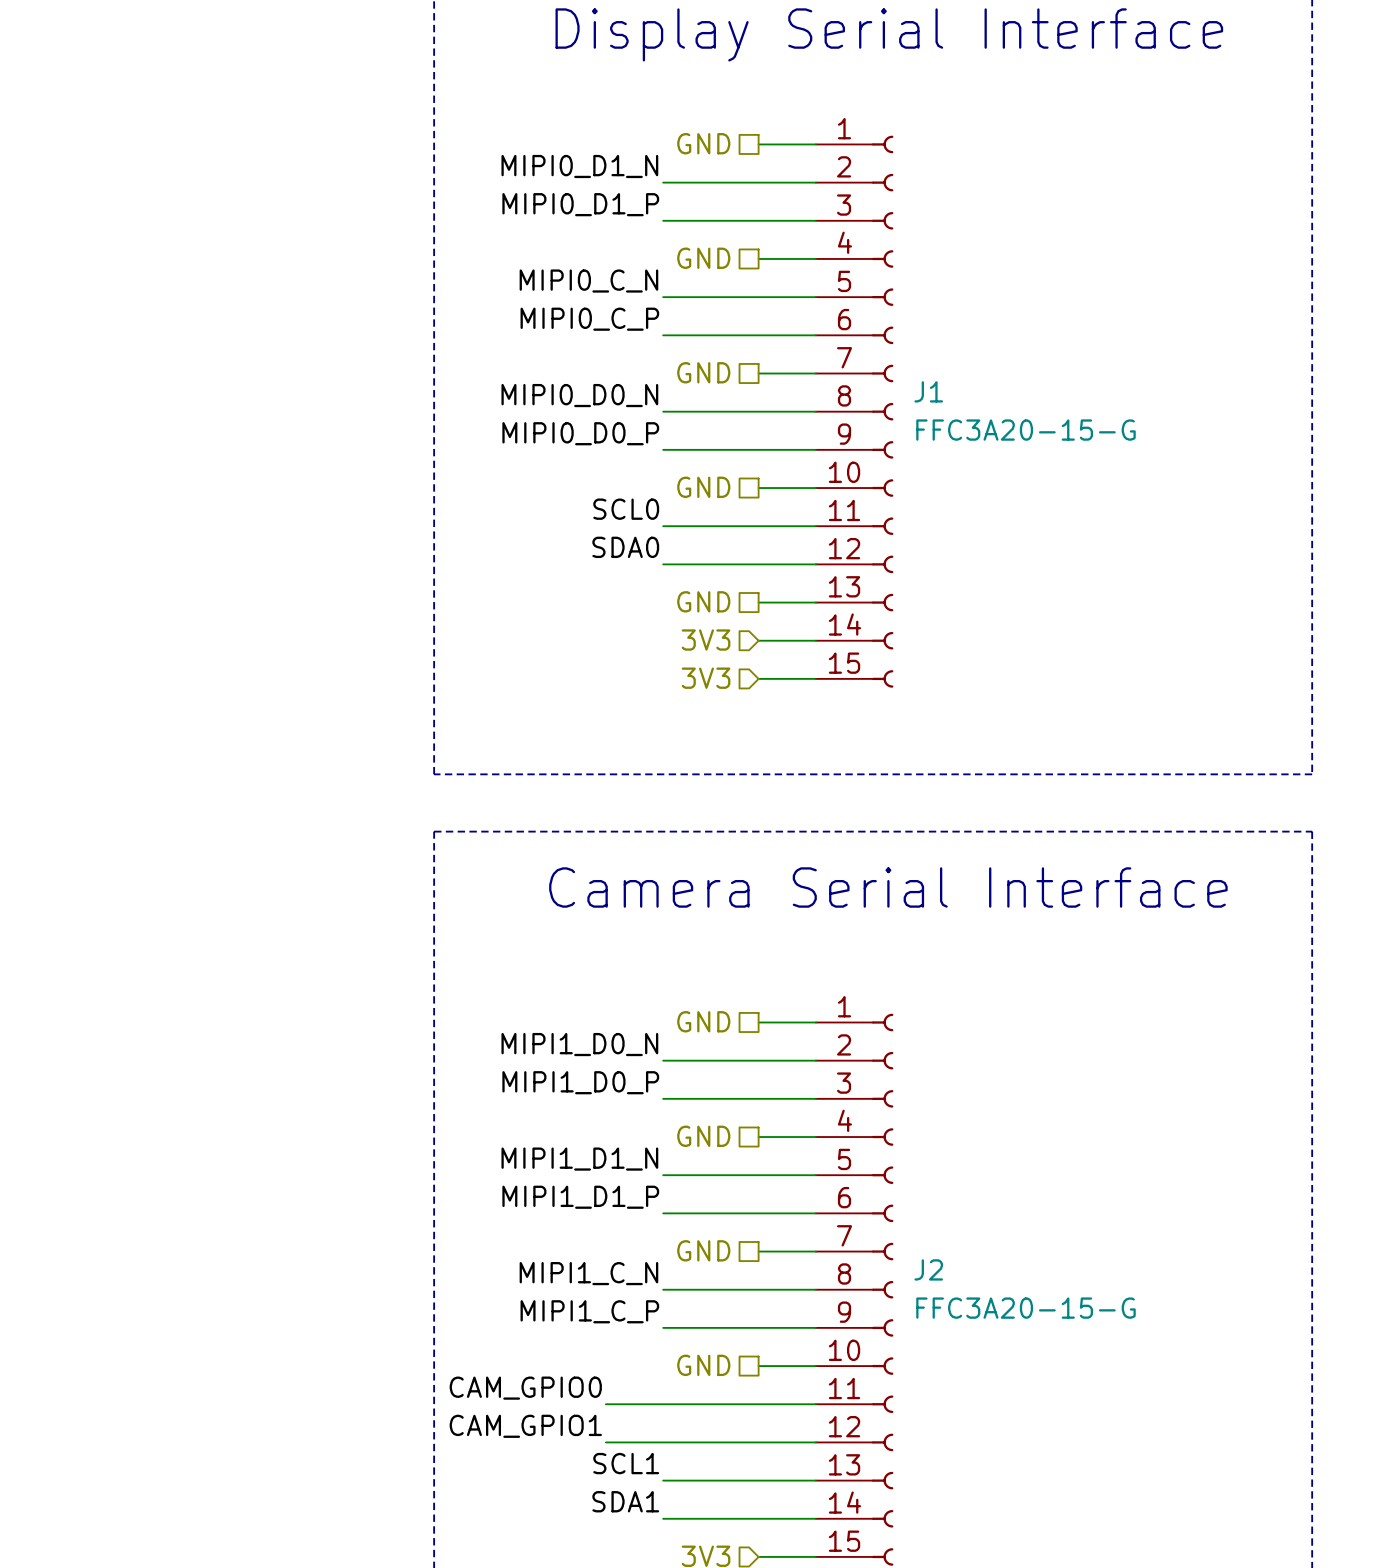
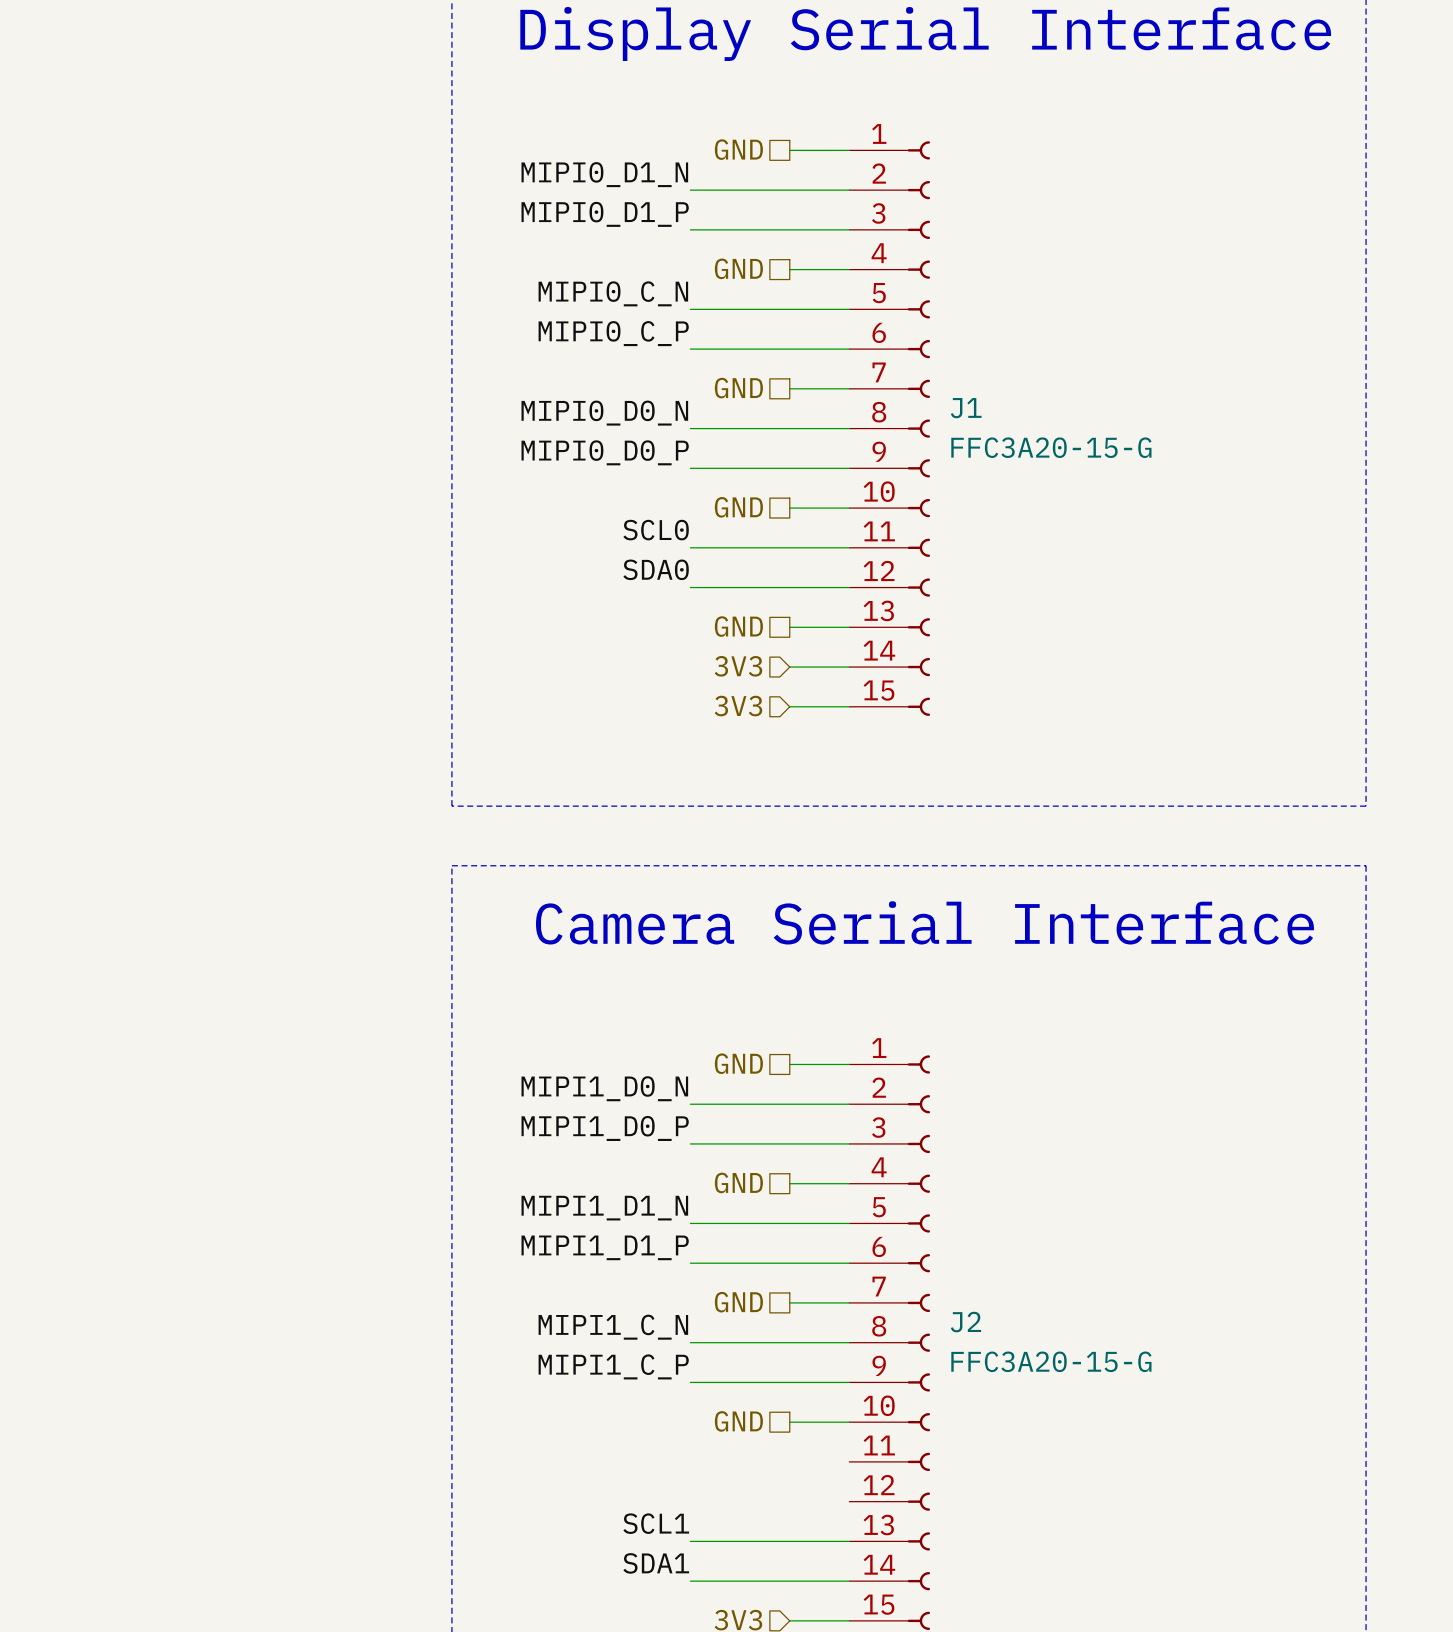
label: CAM_GPIO0 (525, 1388) -> none
wire: (605, 1404) (815, 1404) -> none
label: CAM_GPIO1 (525, 1426) -> none
wire: (605, 1442) (815, 1442) -> none

